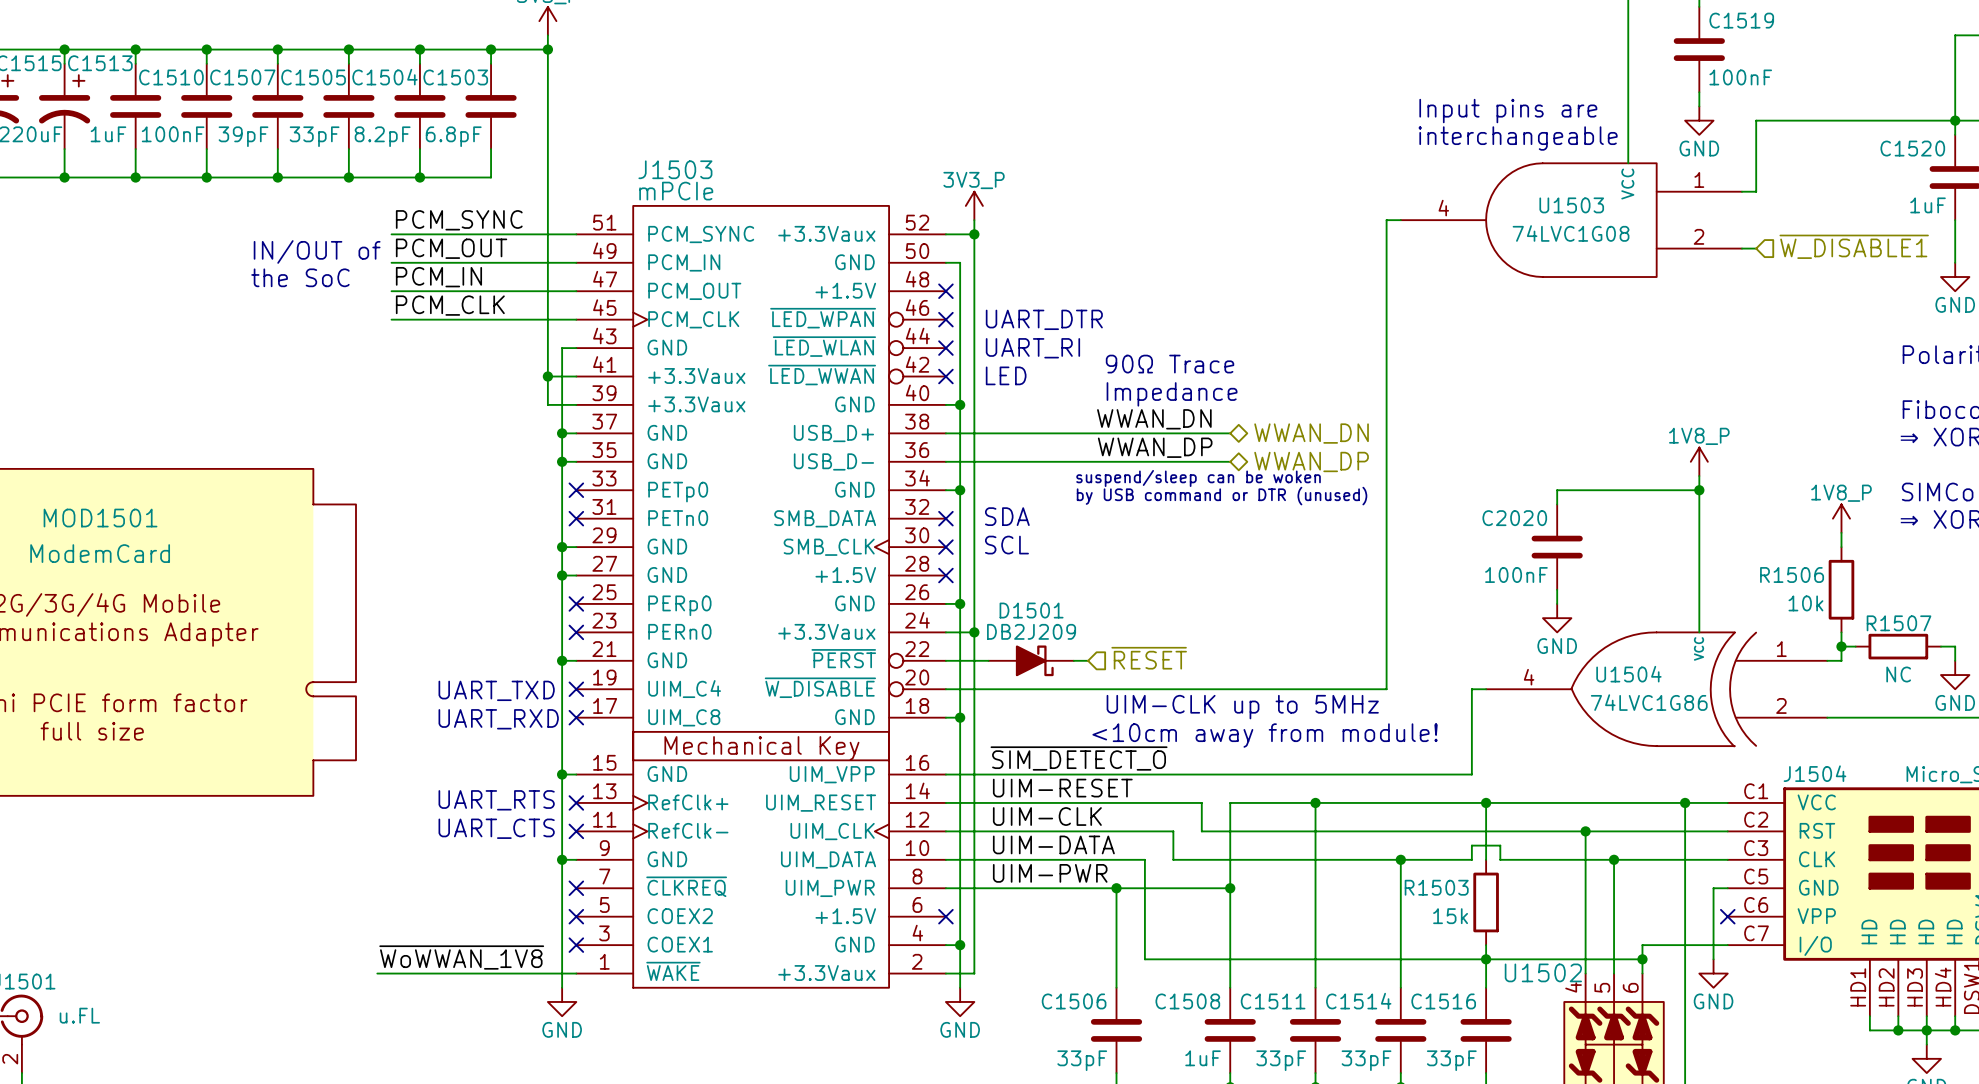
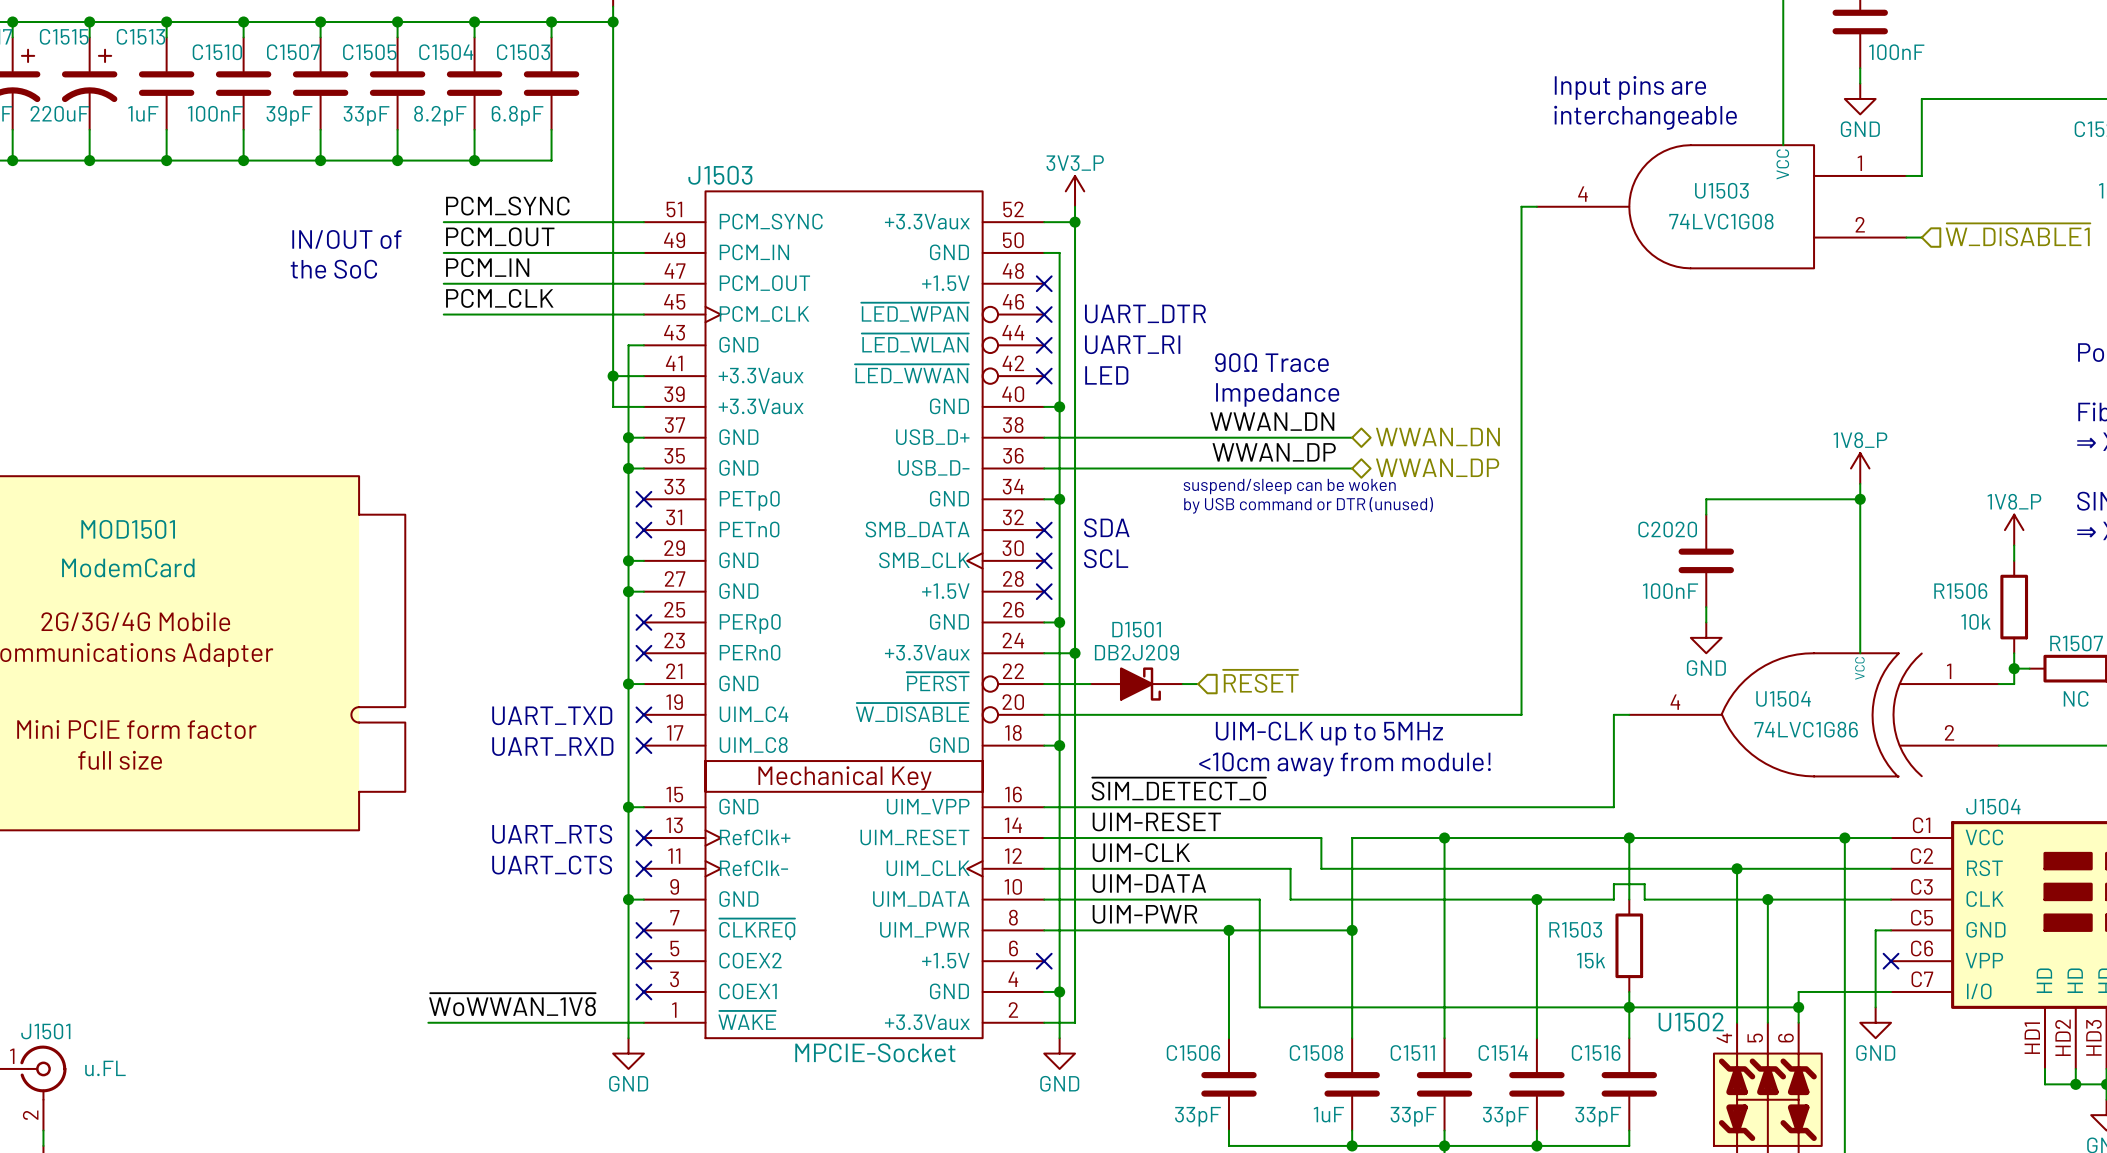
J1503 name position: J1503 (675, 169) -> J1503 (720, 175)
J1503 value: mPCIe (676, 191) -> MPCIE-Socket (875, 1052)

